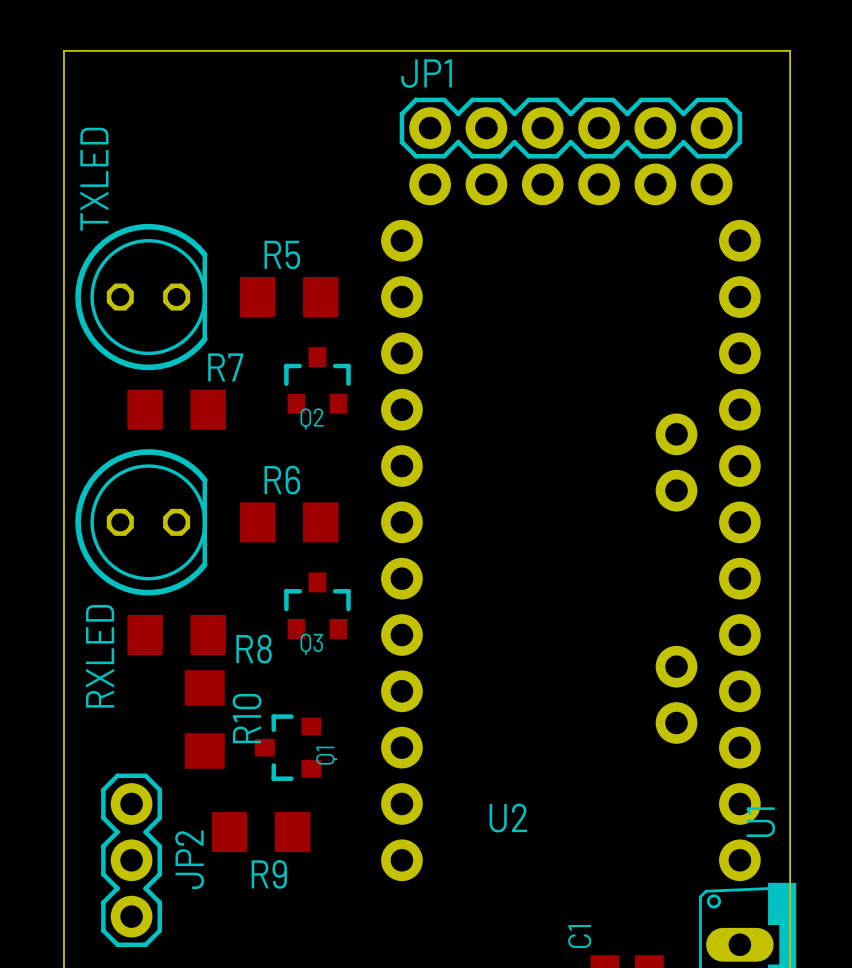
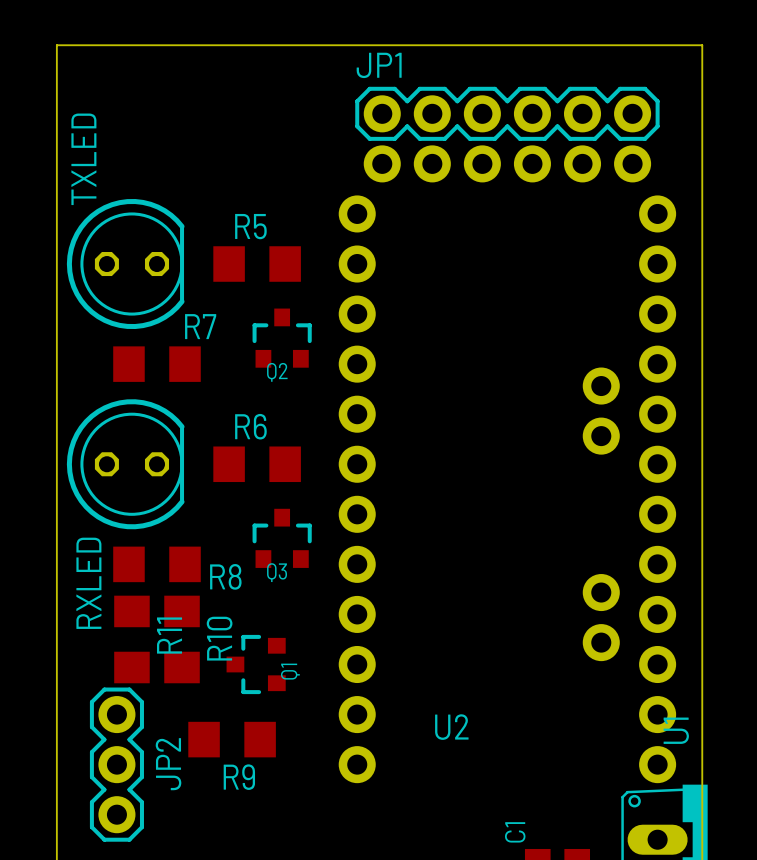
R11: none -> (131, 639)

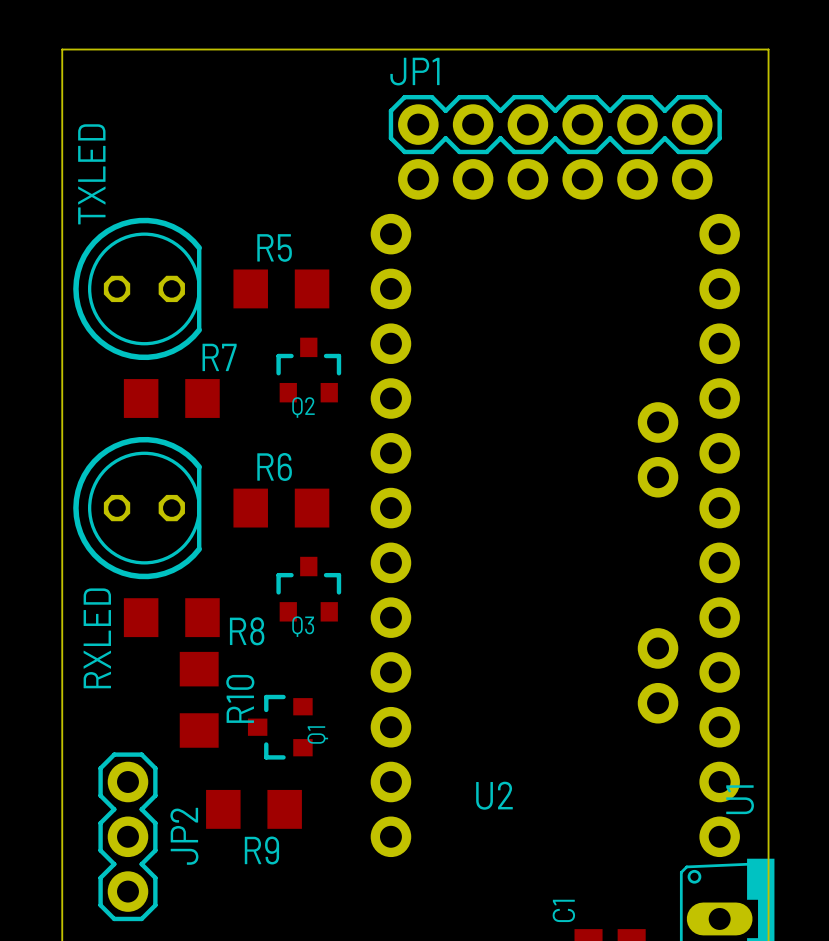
R11: (131, 639) -> none

